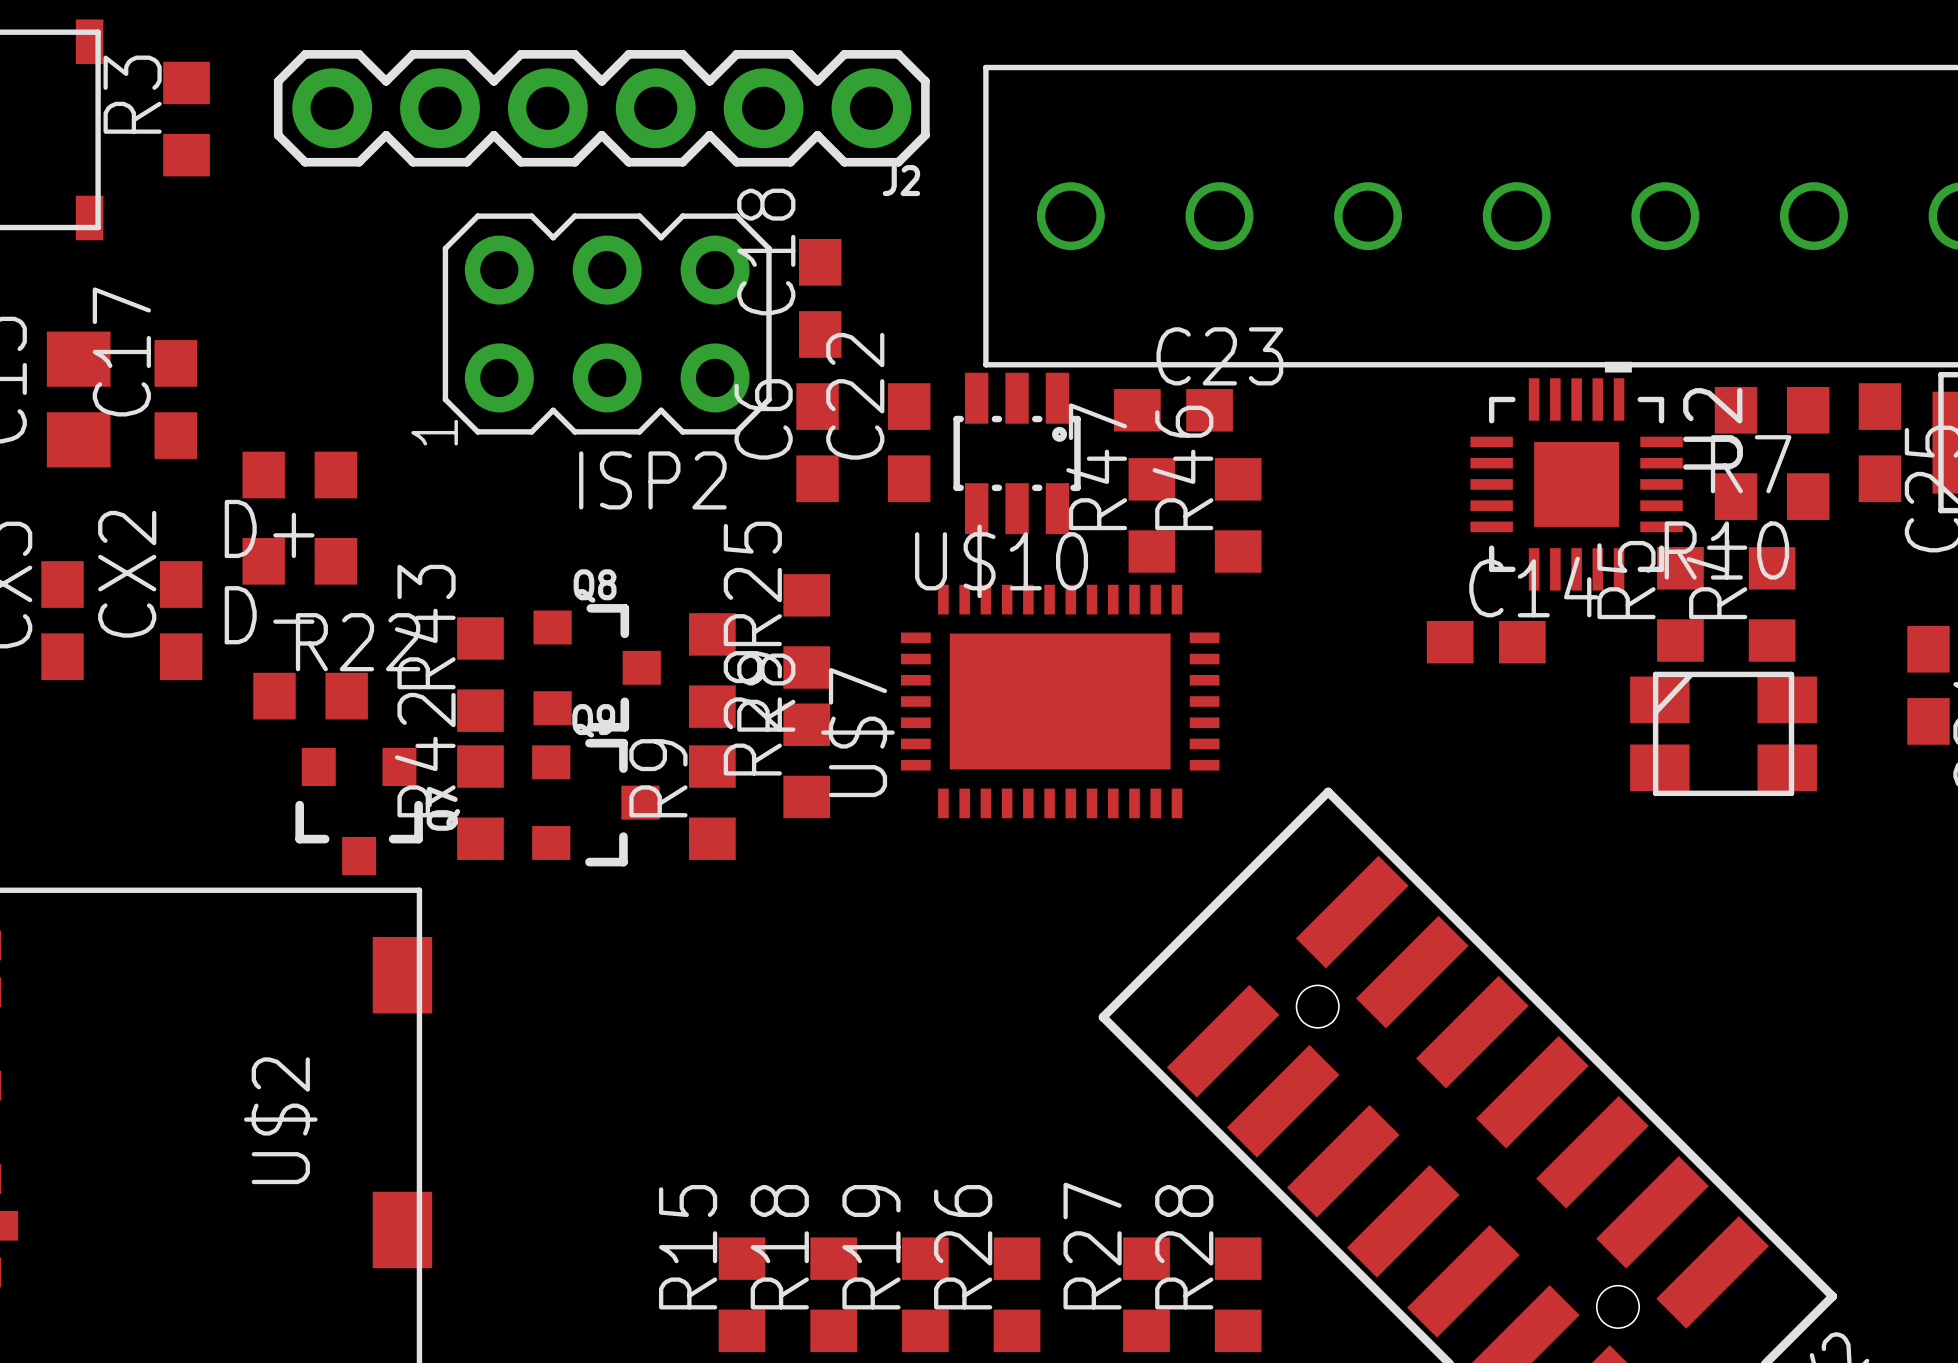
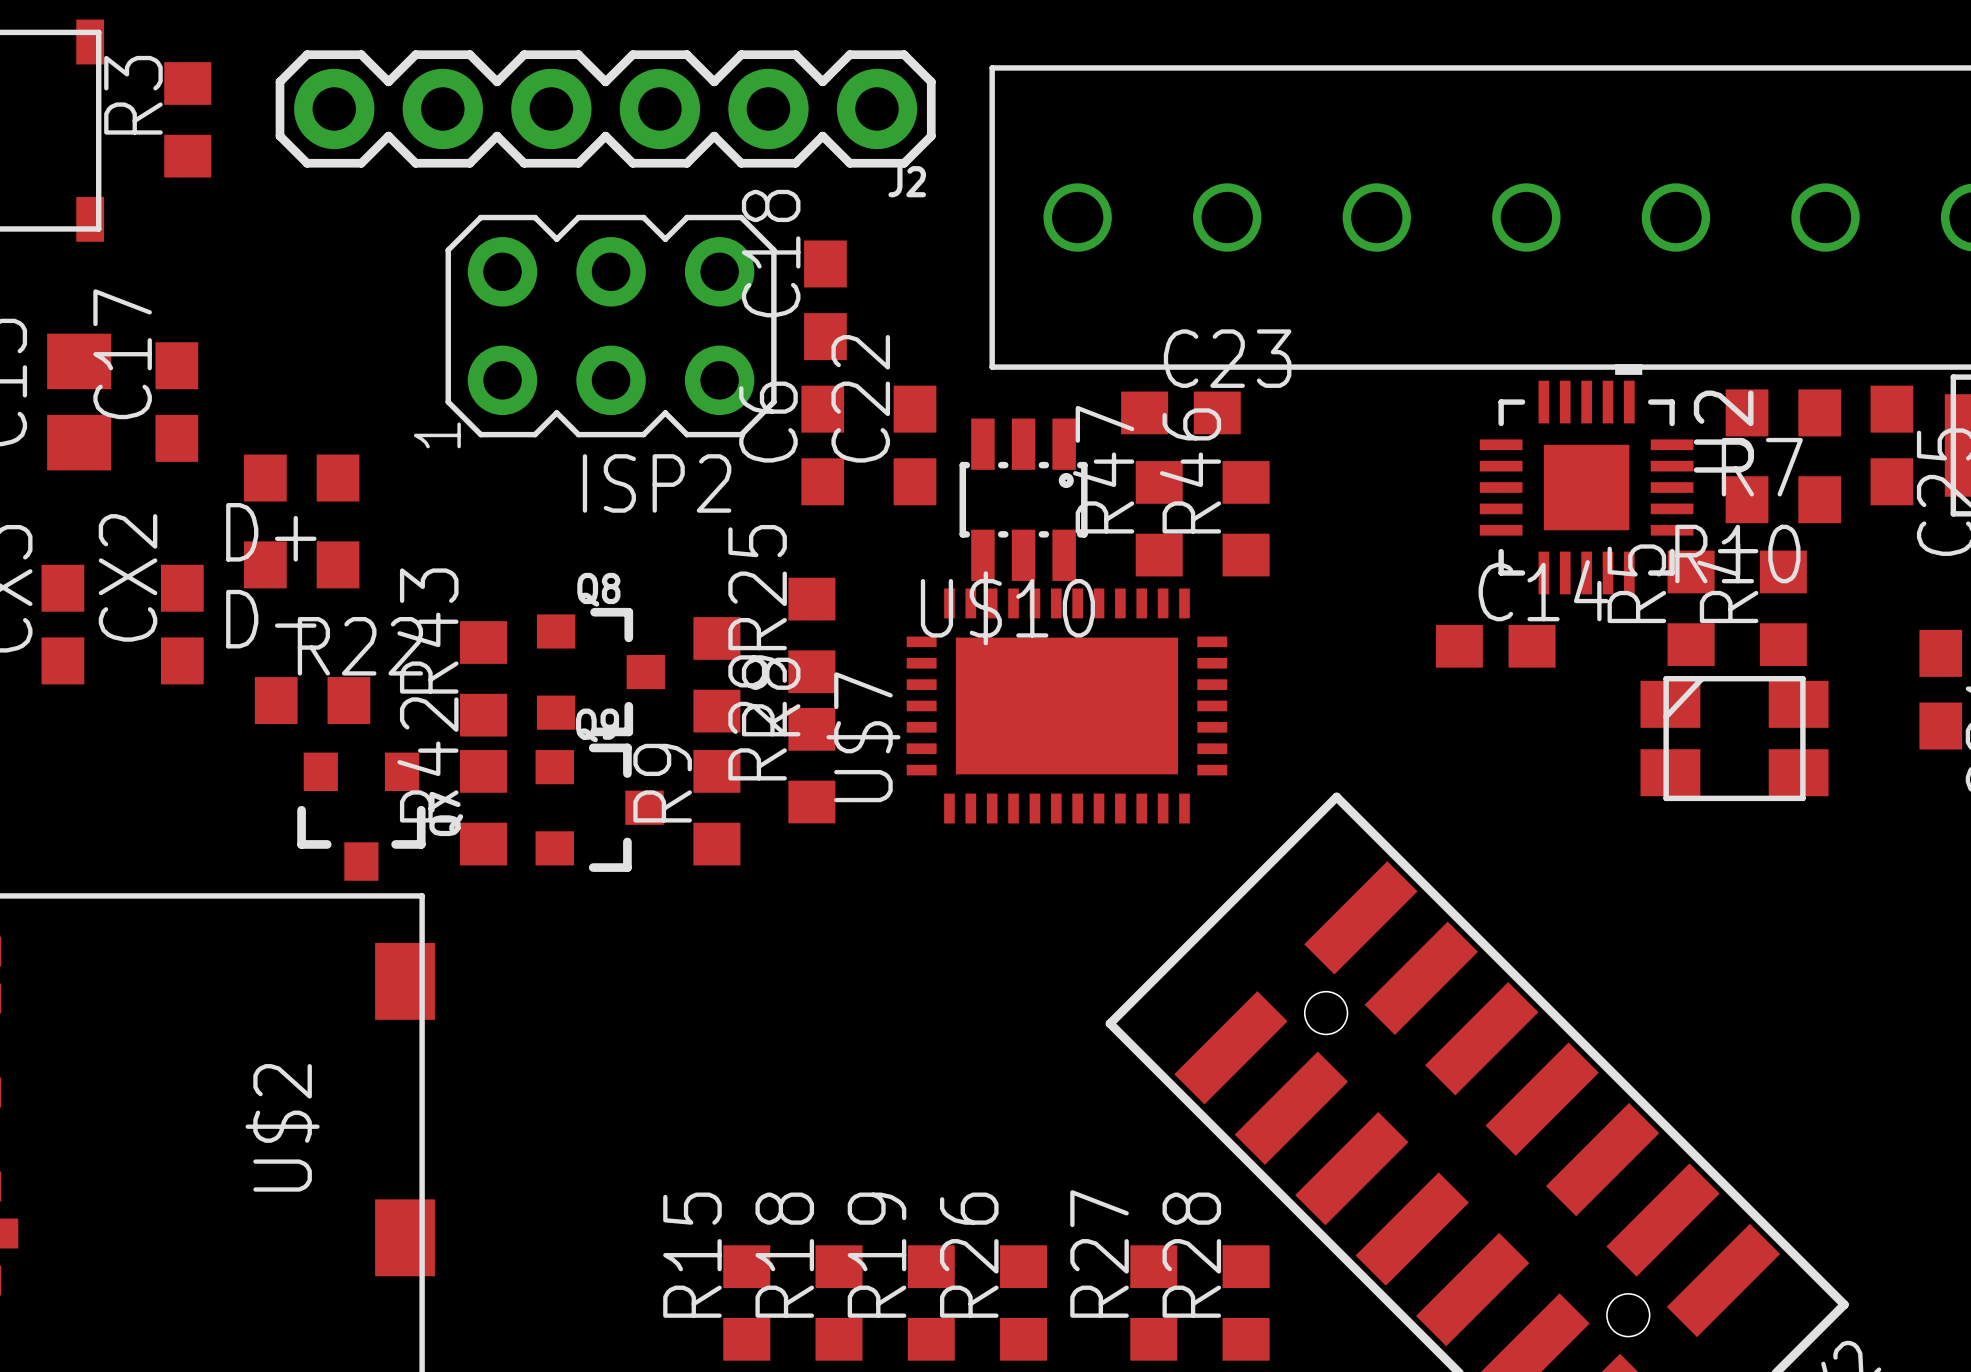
U$10 position: (1017, 453) -> (1023, 499)

